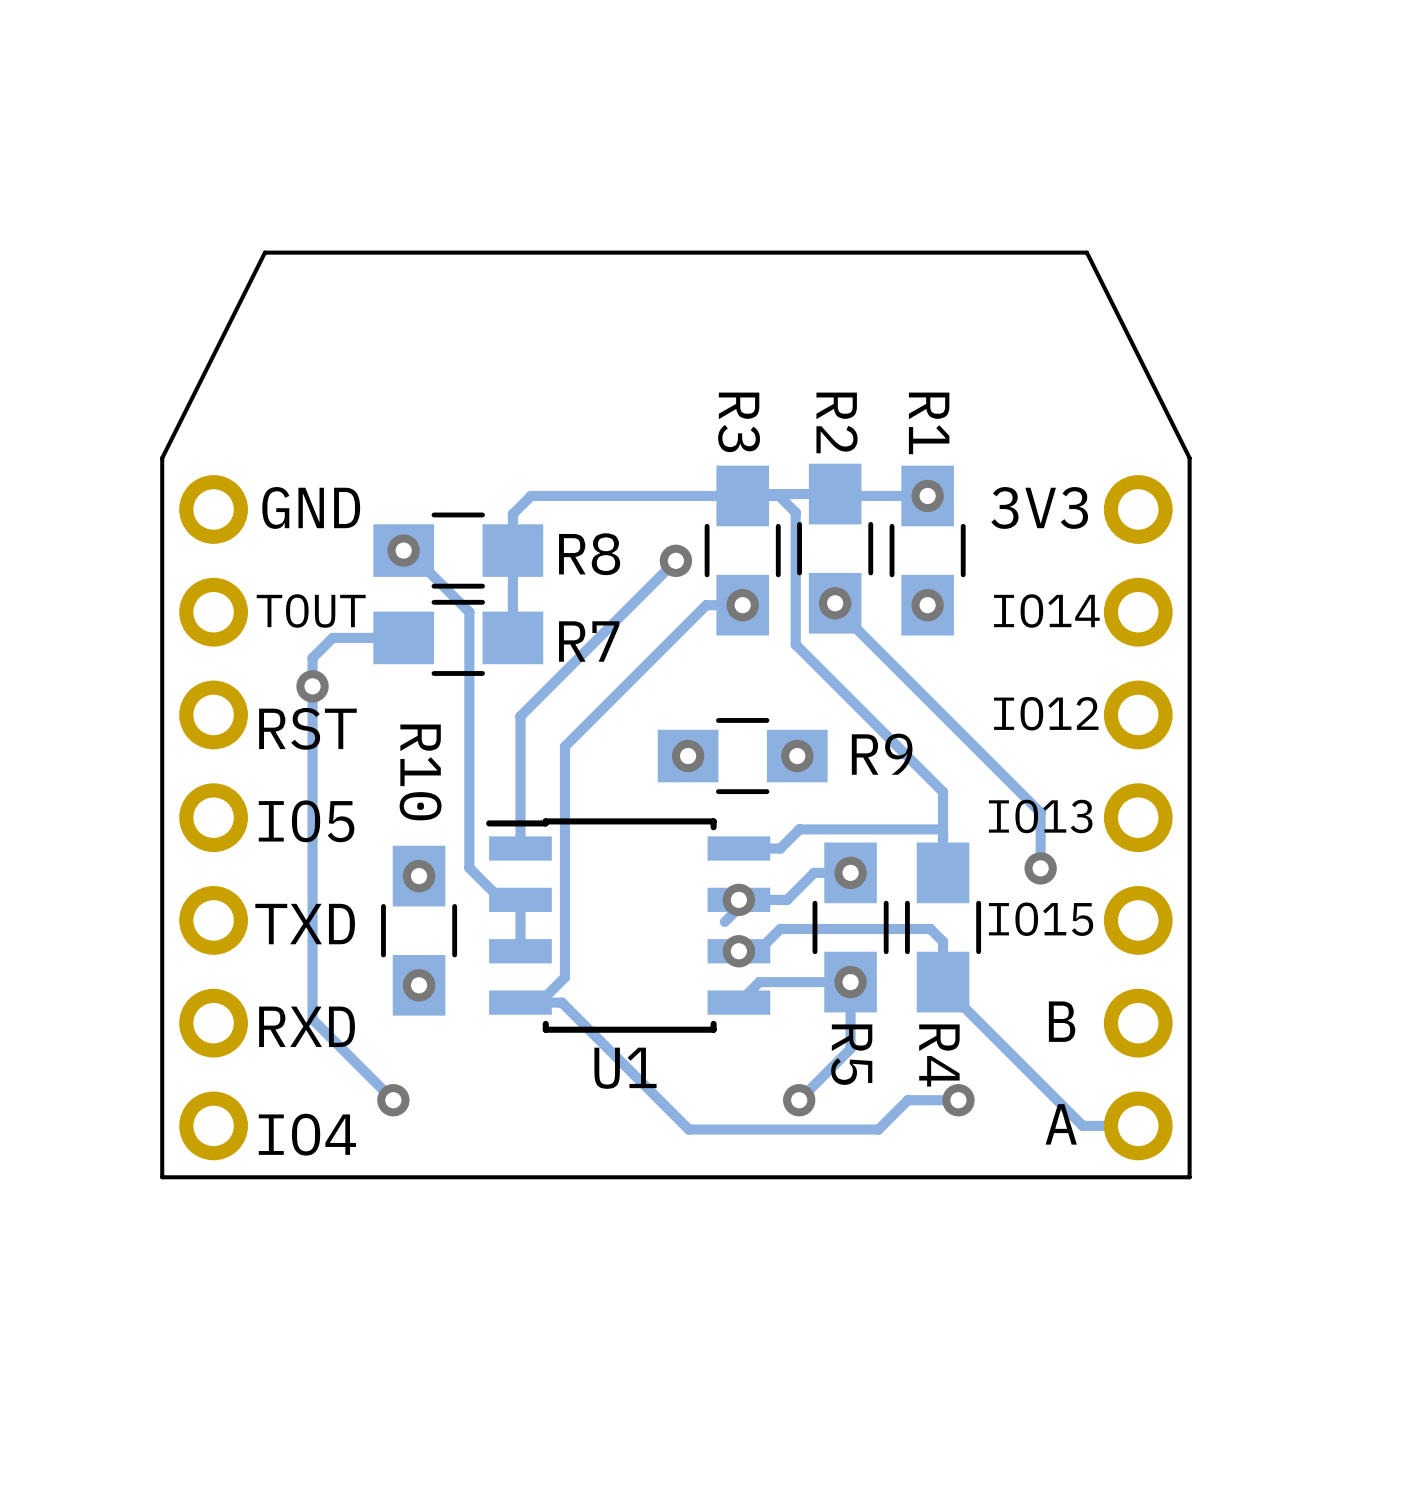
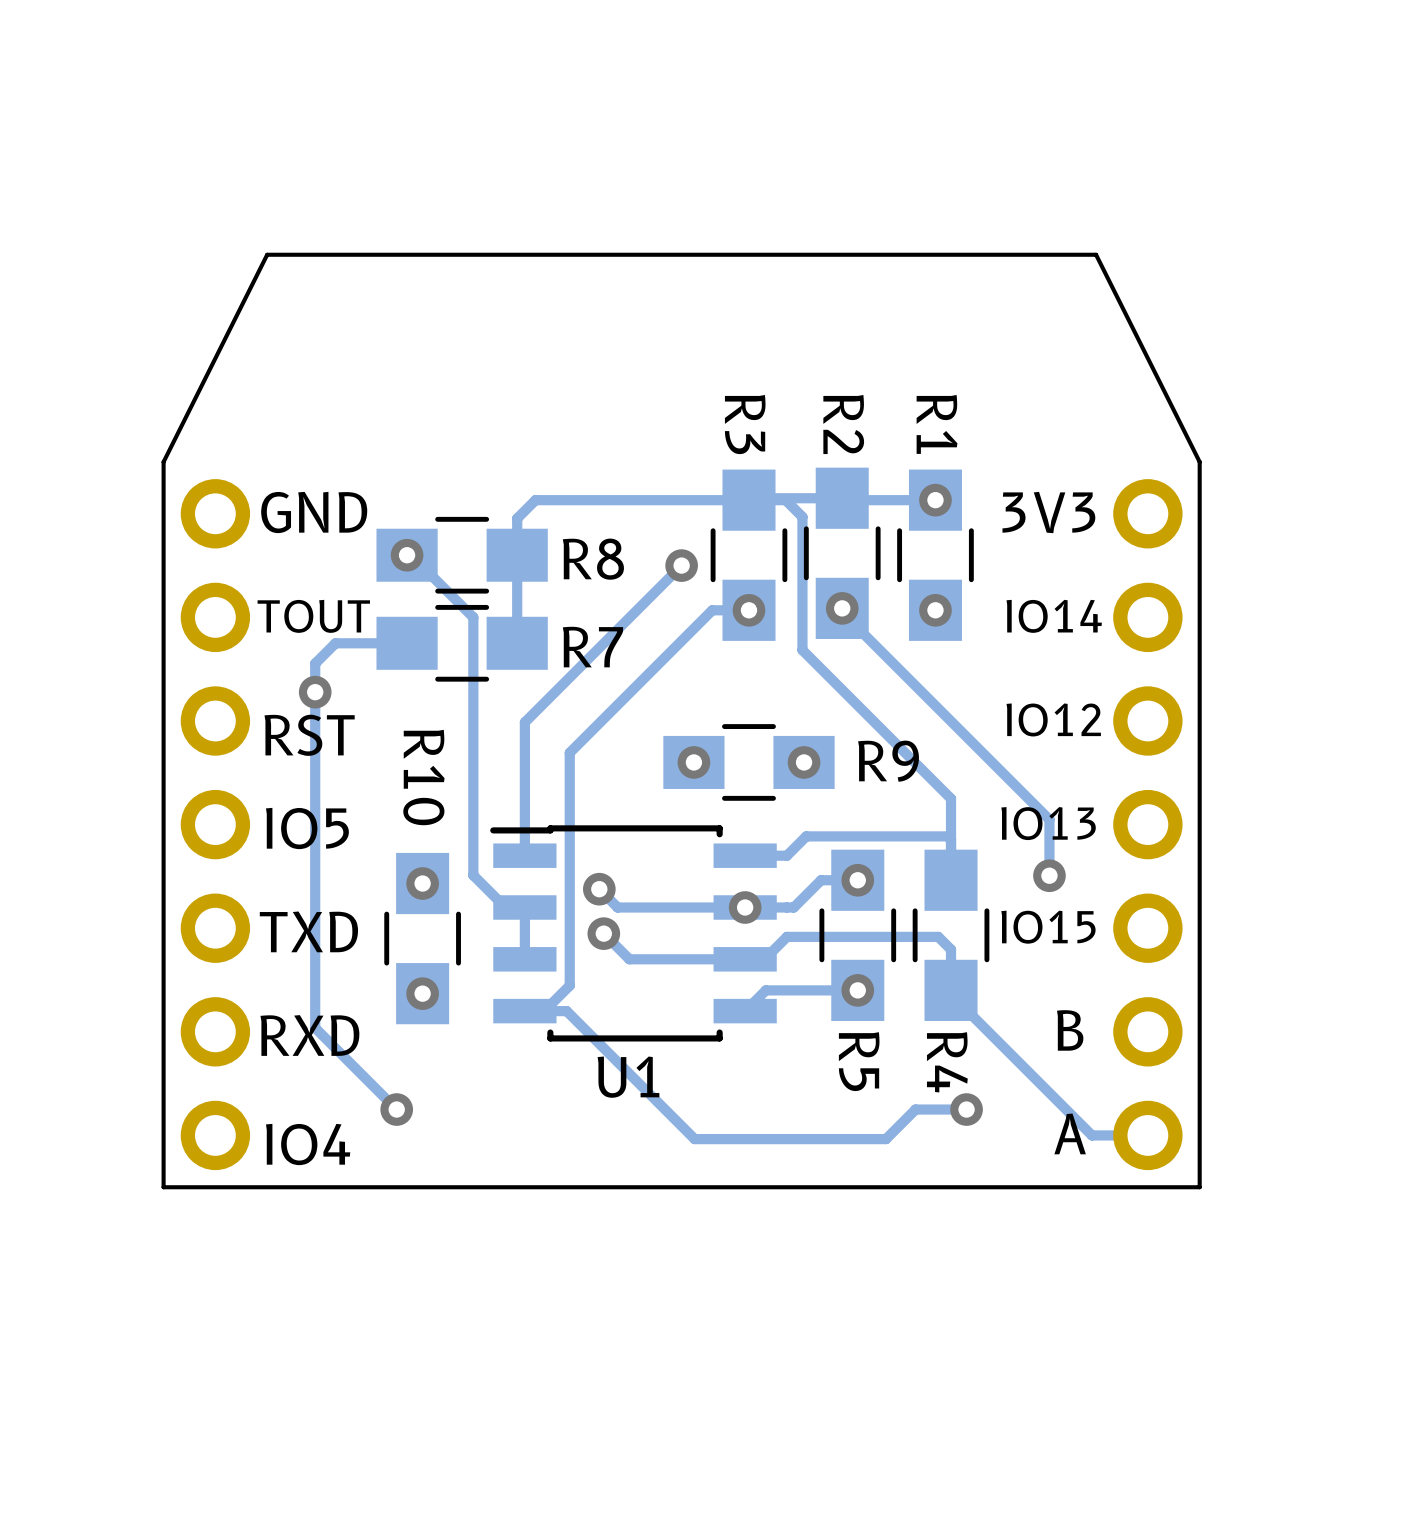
track: none -> (599, 889) (617, 907) (745, 907)
via: none -> (599, 889)
track: (738, 907) (724, 921) -> none
track: none -> (603, 933) (629, 959) (745, 959)
via: none -> (603, 933)
via: (738, 951) -> none
track: (850, 982) (850, 1048) (799, 1100) -> none
via: (799, 1100) -> none

